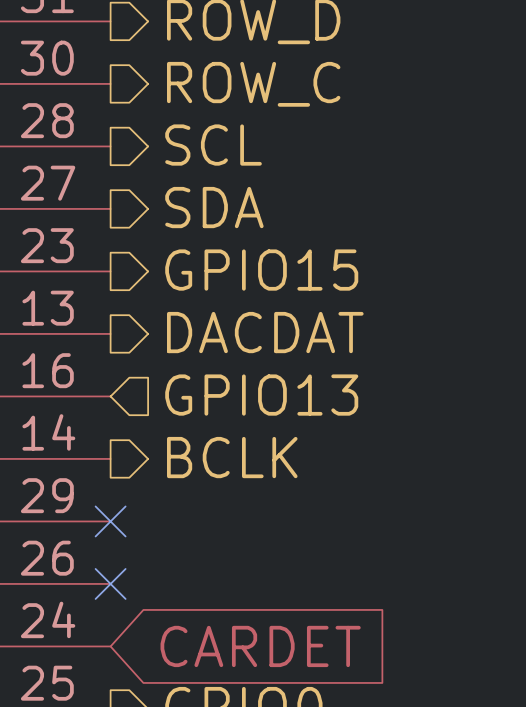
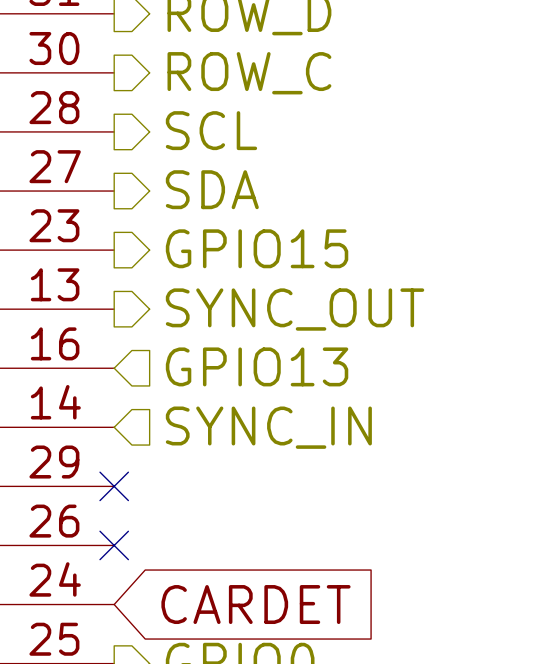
hierarchical label: DACDAT (265, 332) -> SYNC_OUT (295, 309)
hierarchical label shape: output (232, 457) -> input (268, 427)
hierarchical label: BCLK (232, 457) -> SYNC_IN (268, 427)

